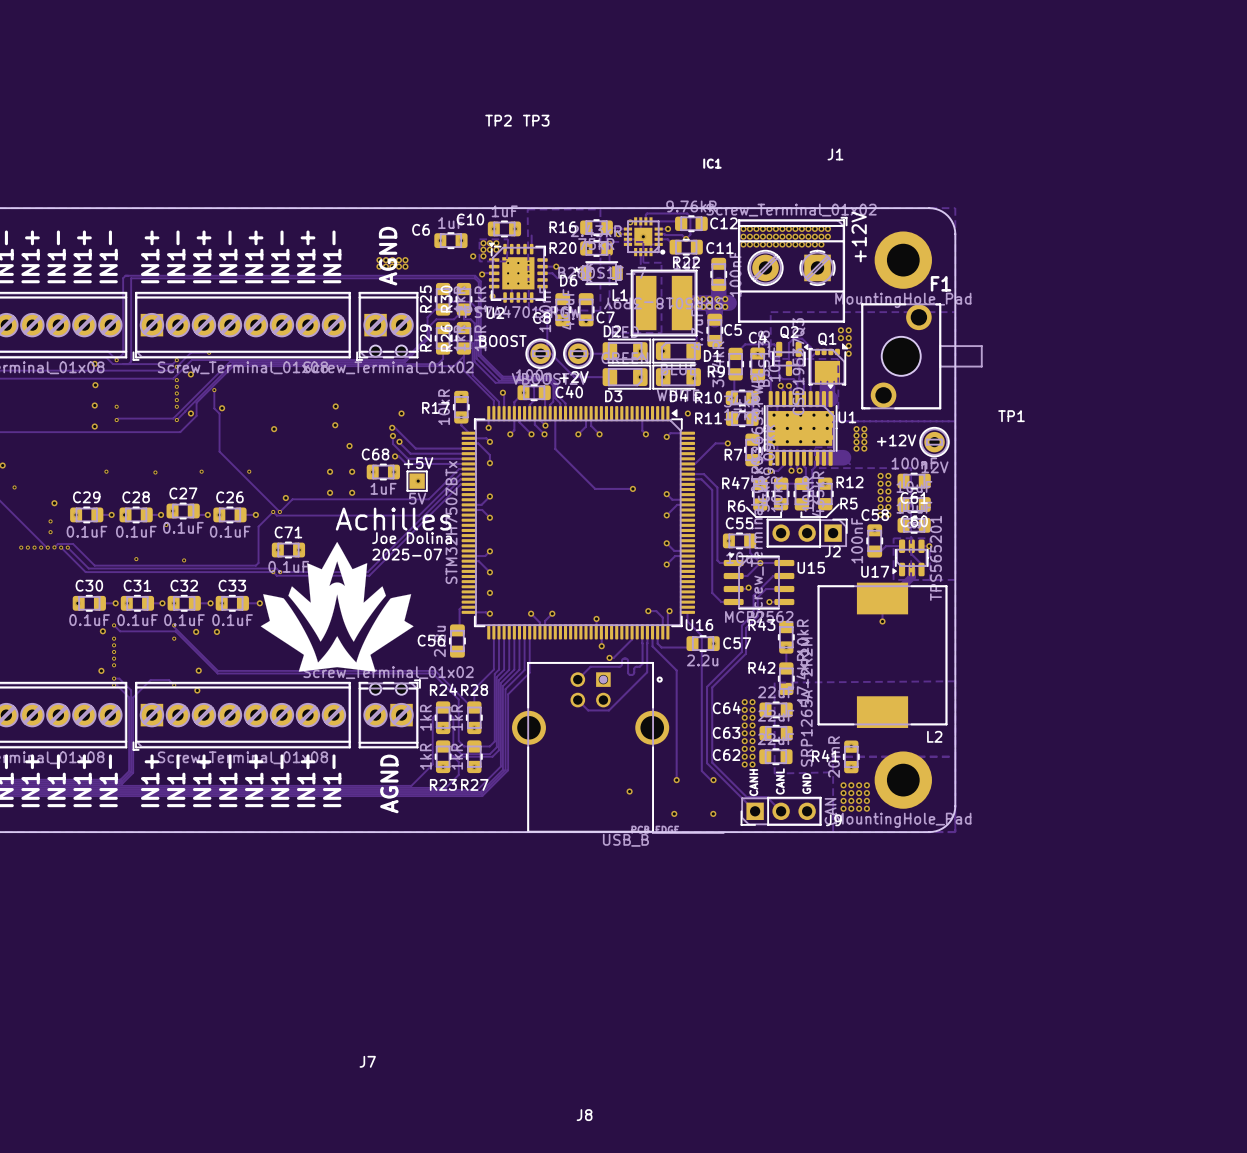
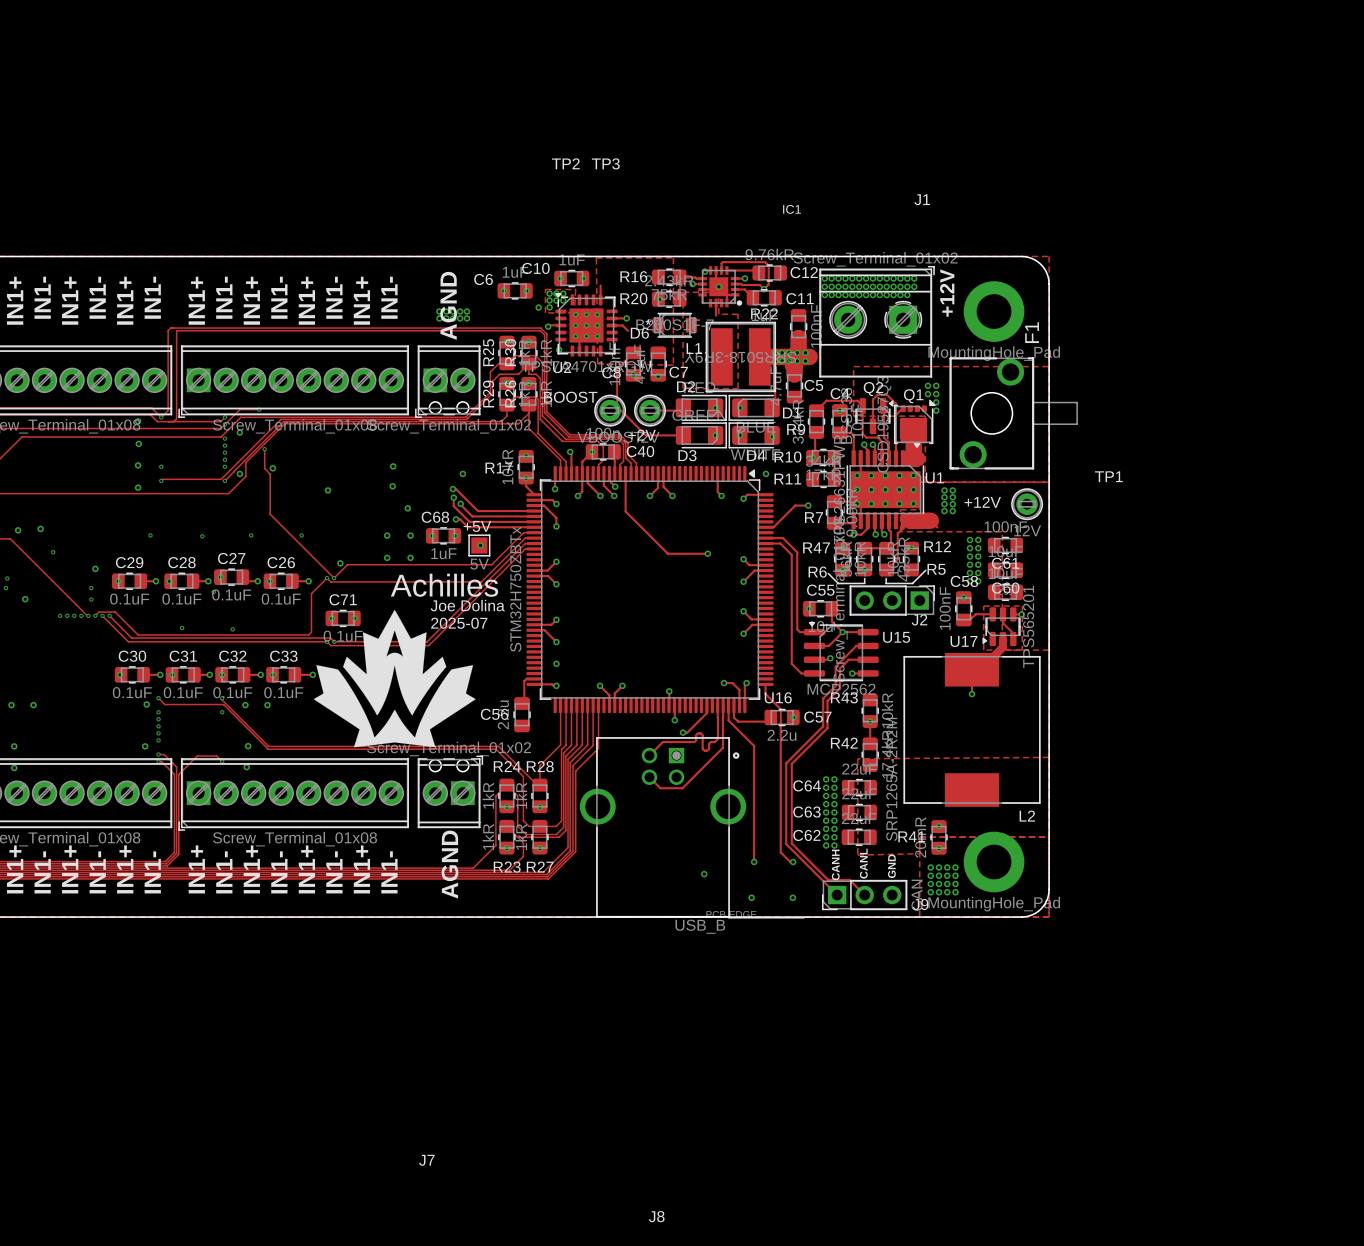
F1 name rotation: 0° (941, 283) -> 90° counterclockwise (1032, 332)

